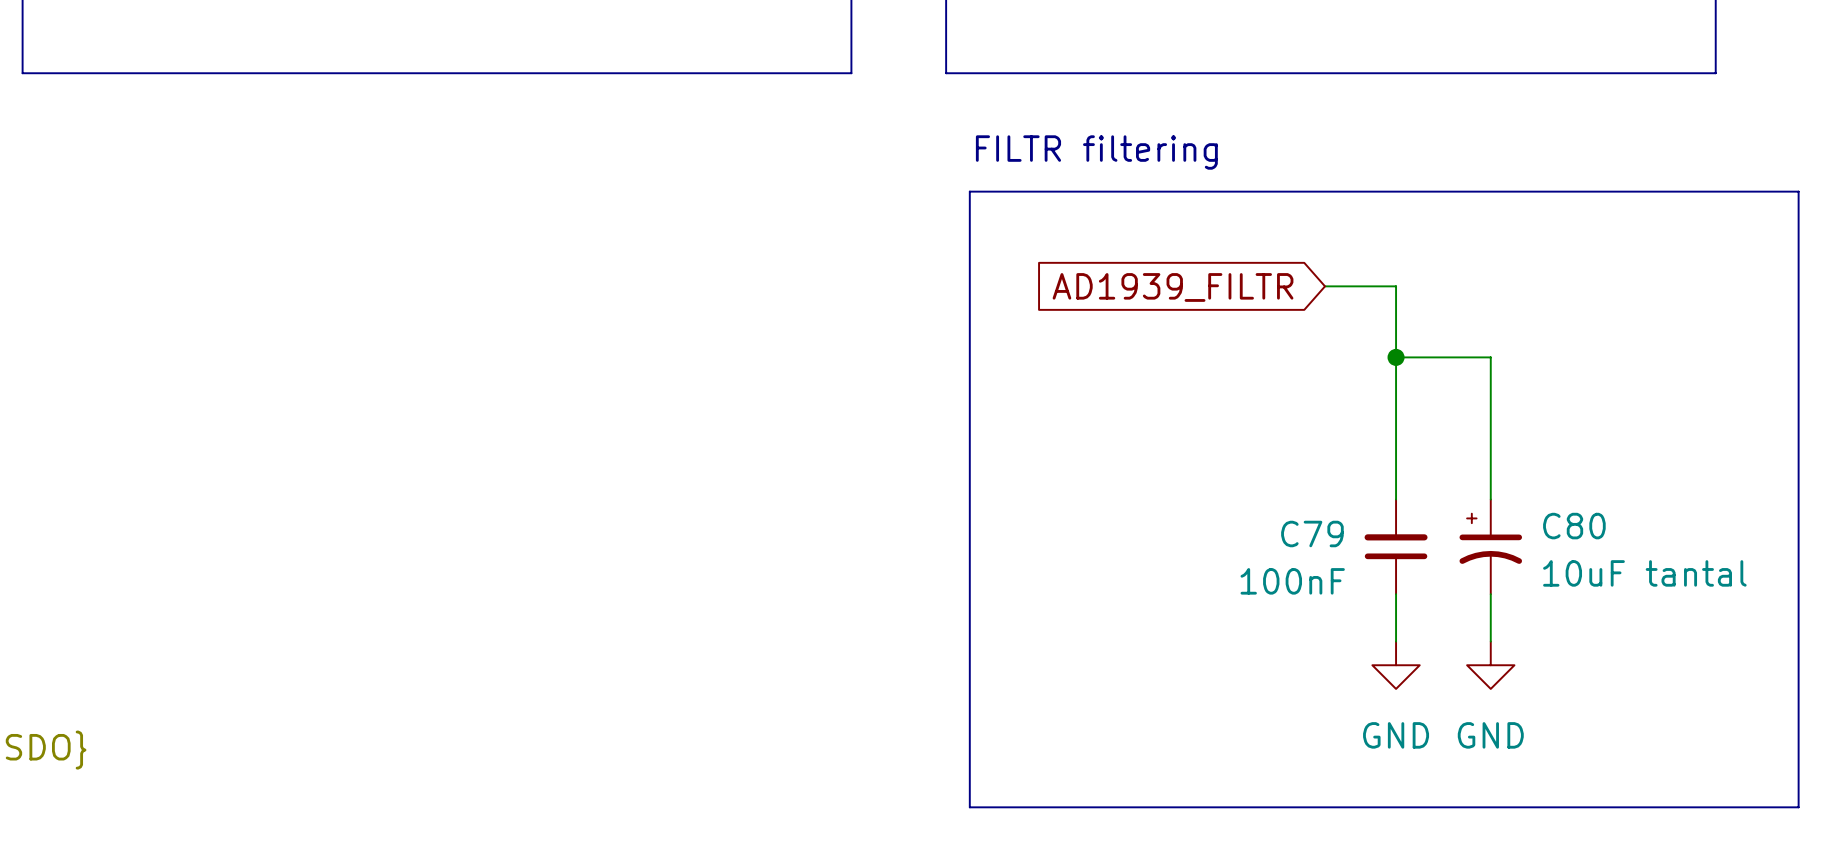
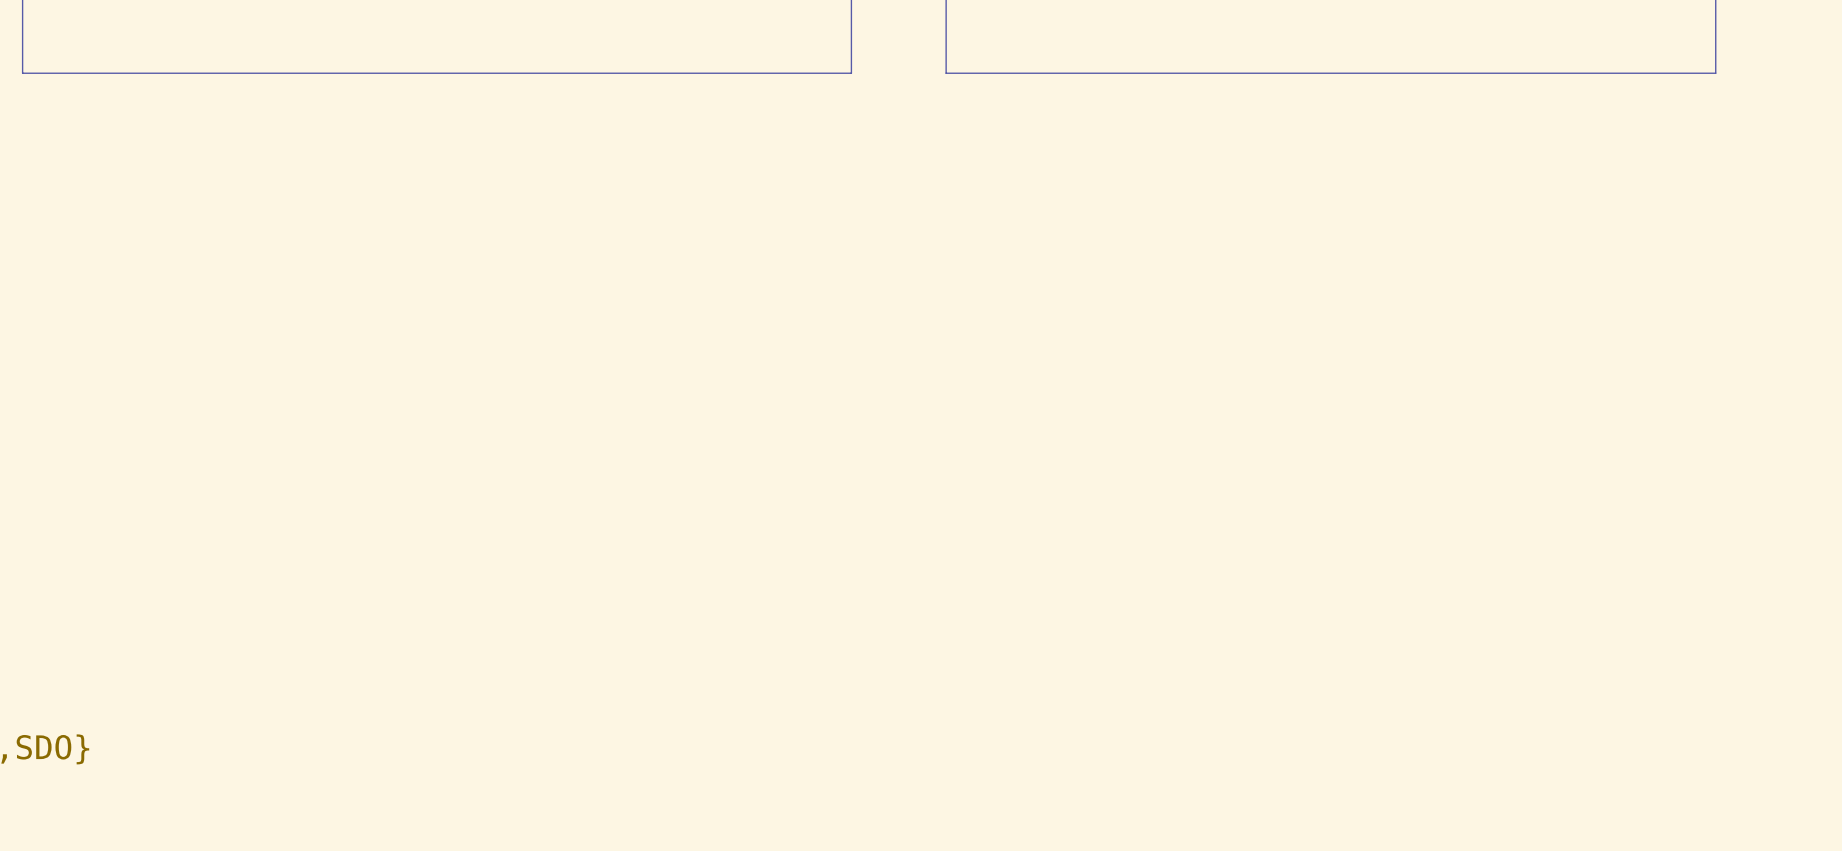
text: FILTR filtering (1096, 152) -> none
line: (969, 191) (1798, 191) (1798, 807) (969, 807) (969, 191) -> none
wire: (1325, 286) (1396, 286) (1396, 499) -> none
global label: AD1939_FILTR (1173, 287) -> none
wire: (1396, 357) (1490, 357) (1490, 499) -> none
junction: (1396, 357) -> none
C79: 100nF (1396, 546) -> none
C80: 10uF tantal (1490, 546) -> none
wire: (1396, 594) (1396, 641) -> none
wire: (1490, 594) (1490, 641) -> none
power symbol: GND (1396, 665) -> none
power symbol: GND (1490, 665) -> none

